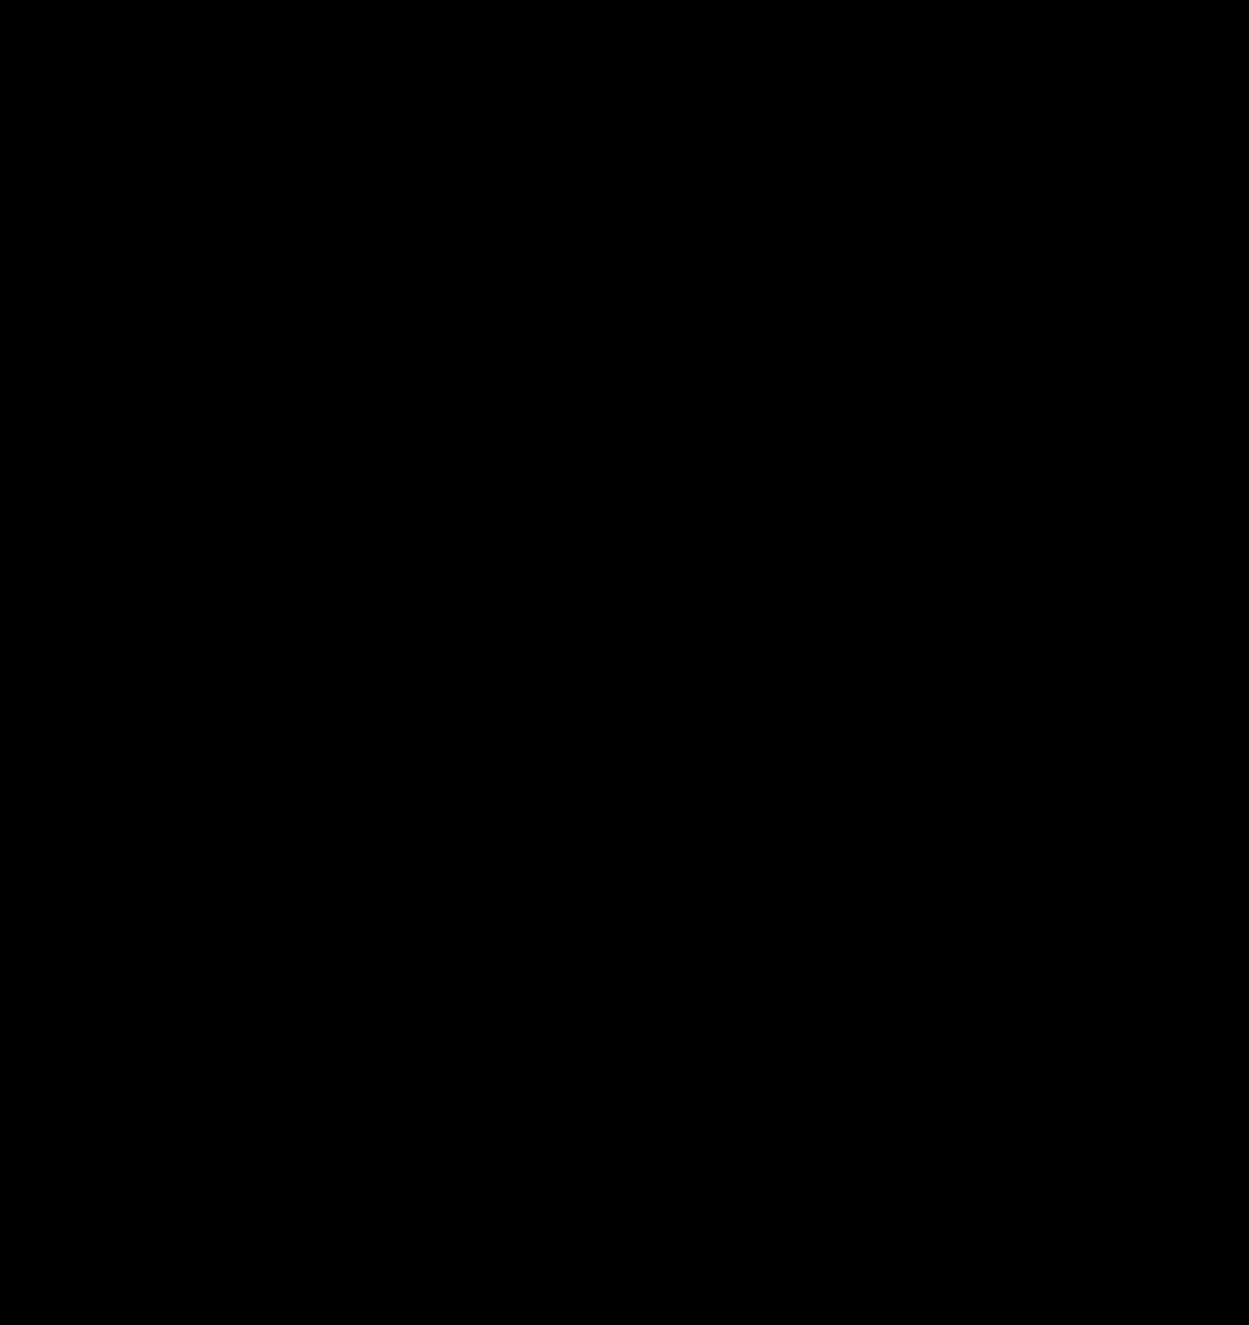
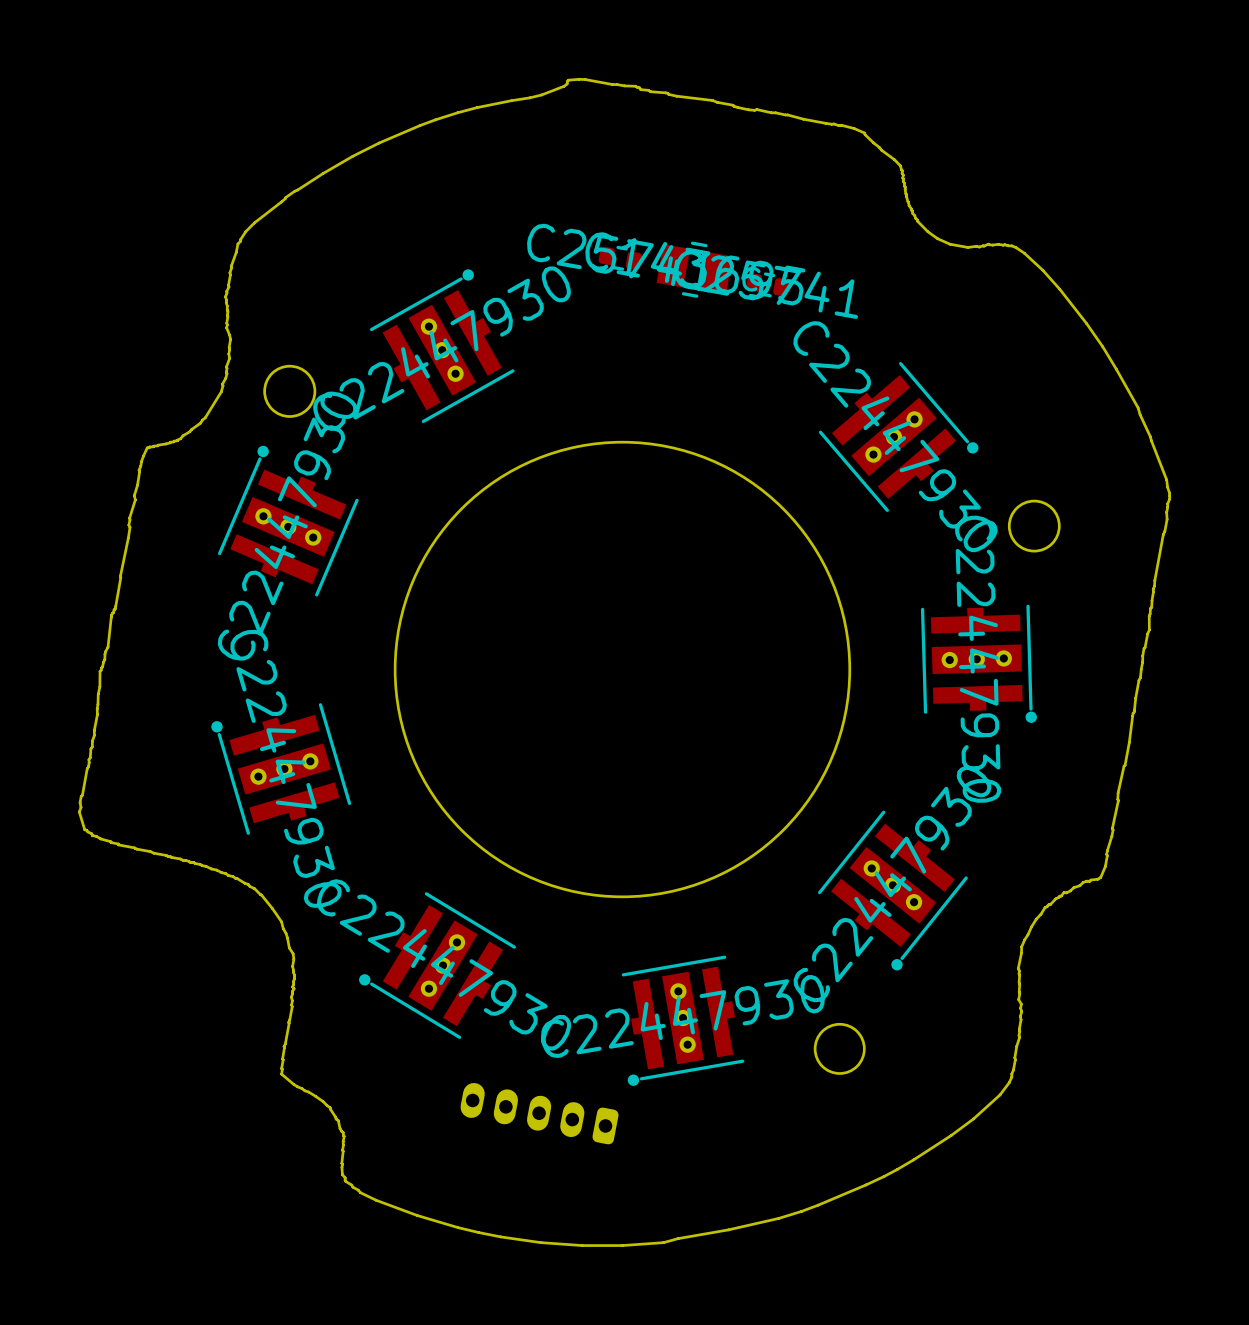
board edge: none -> (579, 79) (568, 80) (564, 86) (541, 94) (477, 107) (435, 119) (379, 143) (352, 156) (294, 191) (245, 231) (237, 243) (225, 296) (227, 311) (226, 327) (230, 339) (226, 373) (221, 391) (205, 417) (180, 438) (147, 447) (139, 470) (115, 606) (111, 617) (108, 647) (100, 671) (94, 735) (79, 811) (84, 829) (92, 835) (118, 844) (193, 862) (225, 873) (254, 888) (272, 908) (281, 921) (293, 959) (292, 1006) (284, 1046) (281, 1074) (293, 1084) (323, 1101) (330, 1107) (338, 1120) (344, 1136) (341, 1163) (342, 1174) (345, 1181) (360, 1192) (376, 1200) (417, 1215) (478, 1232) (540, 1242) (622, 1245) (663, 1242) (728, 1229) (778, 1218) (818, 1205) (884, 1176) (913, 1159) (973, 1118) (1000, 1094) (1009, 1082) (1019, 1037) (1021, 1011) (1018, 999) (1018, 968) (1024, 939) (1045, 907) (1064, 892) (1083, 882) (1100, 877) (1105, 866) (1129, 742) (1144, 648) (1149, 629) (1153, 589) (1167, 519) (1169, 495) (1166, 479) (1138, 407) (1102, 346) (1059, 289) (1042, 270) (1015, 247) (988, 244) (967, 247) (949, 244) (927, 231) (917, 221) (909, 205) (900, 165) (864, 133) (841, 125) (756, 109) (748, 109) (712, 100) (650, 91) (635, 86) (579, 79)
part: none -> (620, 258)
part: none -> (694, 269)
part: none -> (767, 284)
part: none -> (442, 346)
round board edge: none -> [263, 364, 317, 418]
part: none -> (898, 436)
round board edge: none -> [393, 440, 852, 899]
round board edge: none -> [1007, 499, 1061, 553]
part: none -> (288, 521)
part: none -> (978, 663)
part: none -> (281, 769)
part: none -> (892, 890)
part: none -> (437, 965)
part: none -> (683, 1020)
round board edge: none -> [813, 1022, 866, 1075]
part: none -> (539, 1113)

